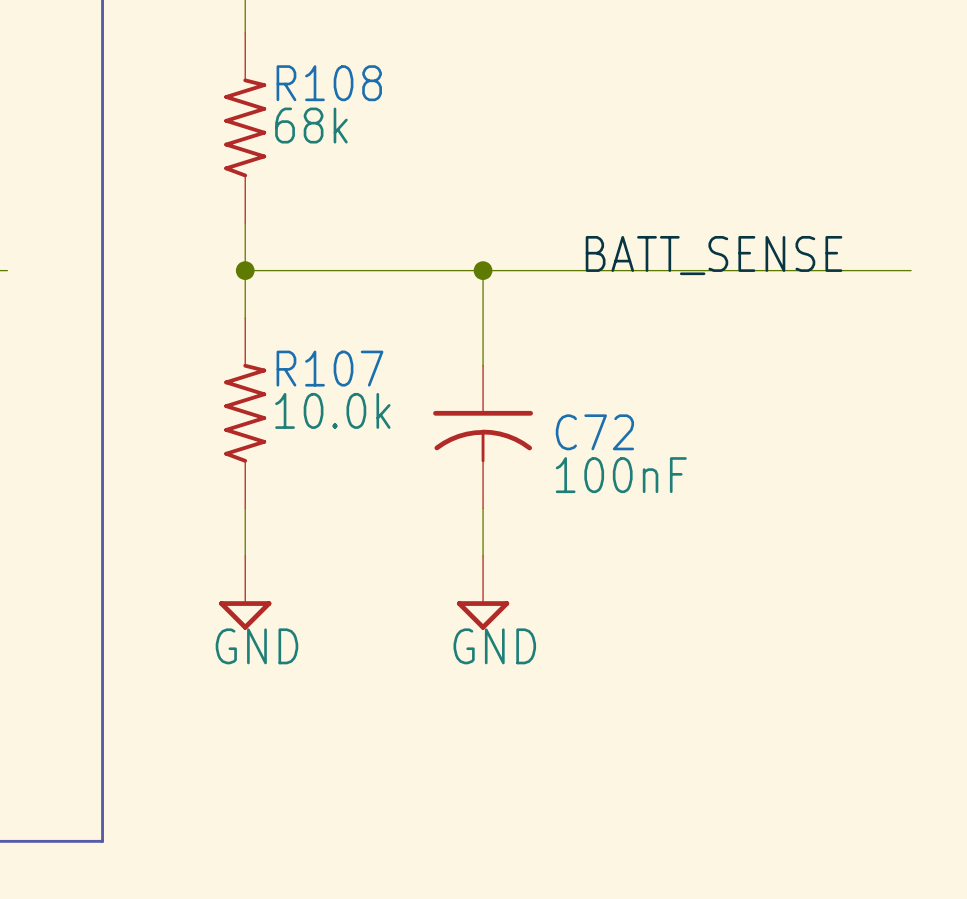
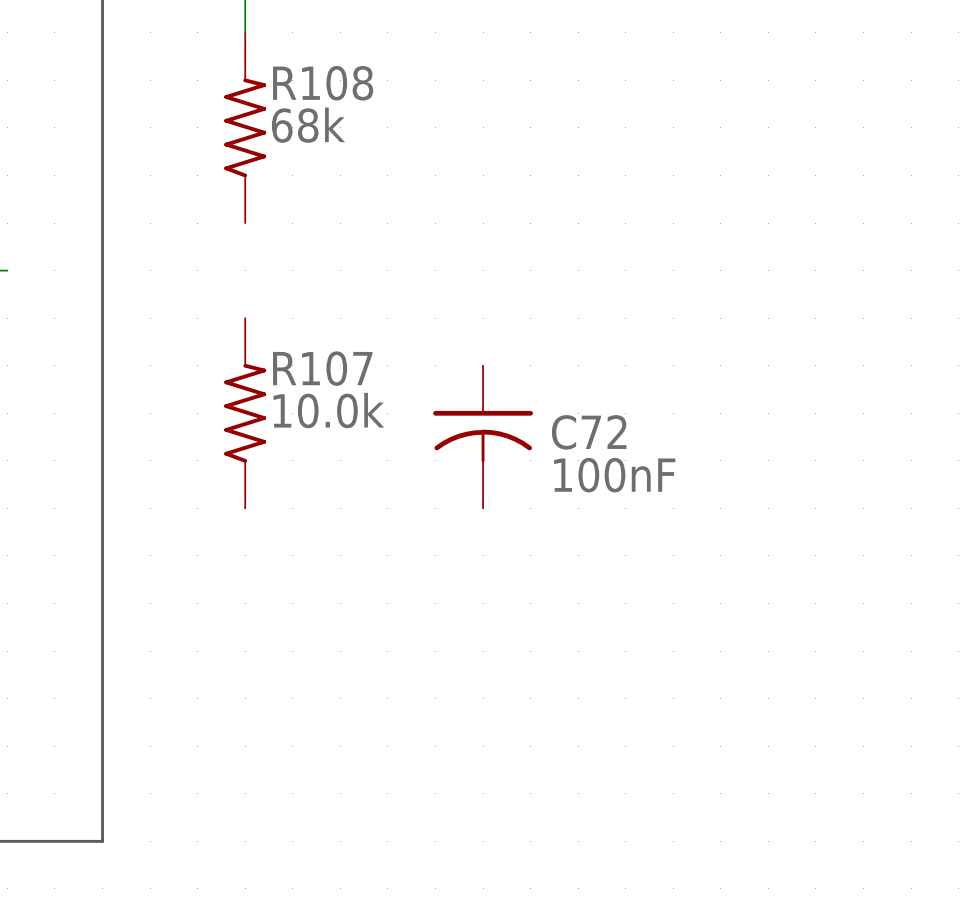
wire: (245, 223) (245, 318) -> none
label: BATT_SENSE (714, 255) -> none
wire: (245, 270) (911, 270) -> none
junction: (245, 270) -> none
wire: (483, 270) (483, 365) -> none
junction: (483, 270) -> none
wire: (245, 508) (245, 555) -> none
wire: (483, 508) (483, 555) -> none
power symbol: GND (245, 592) -> none
power symbol: GND (483, 592) -> none

